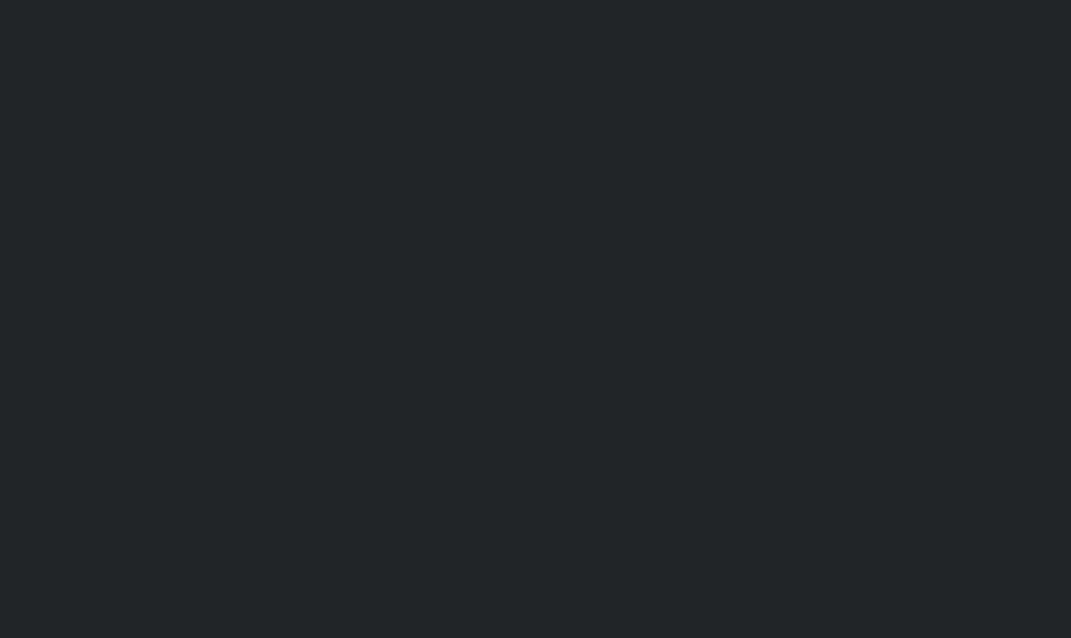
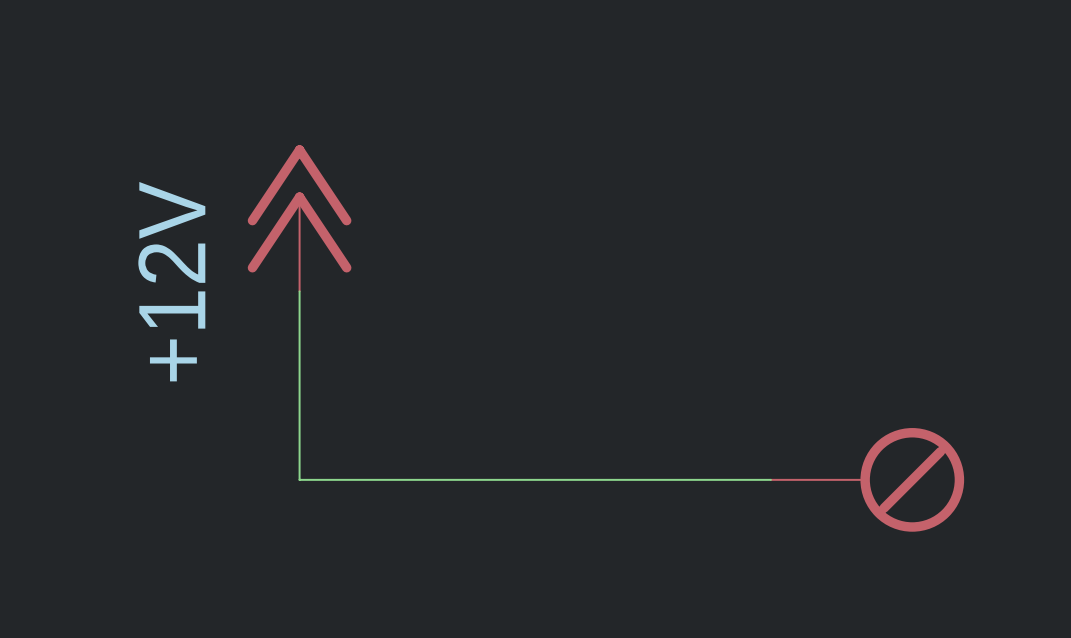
power symbol: none -> +12V (299, 218)
wire: none -> (299, 291) (299, 479) (770, 479)
part: none -> (867, 479)

